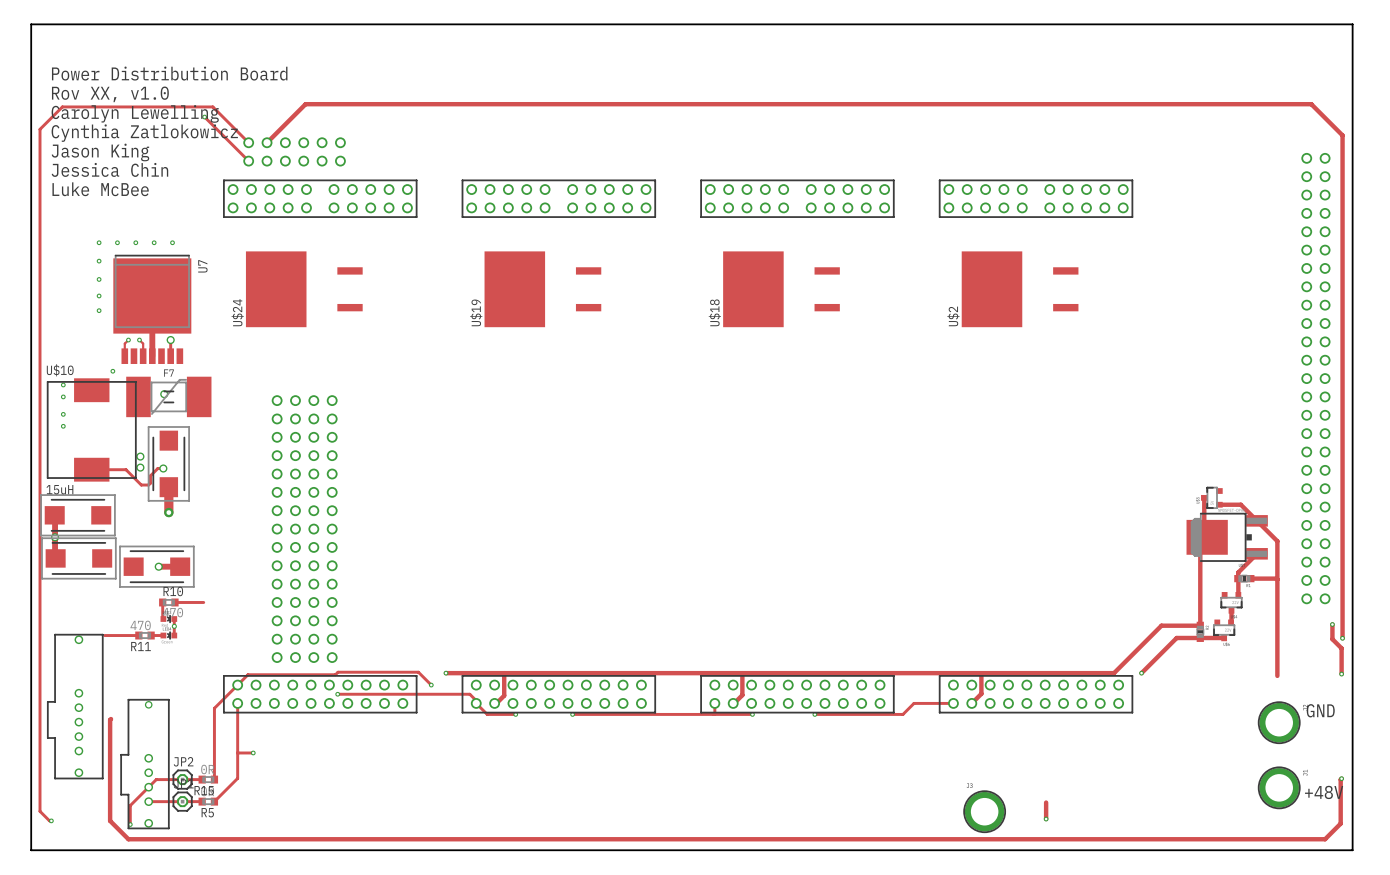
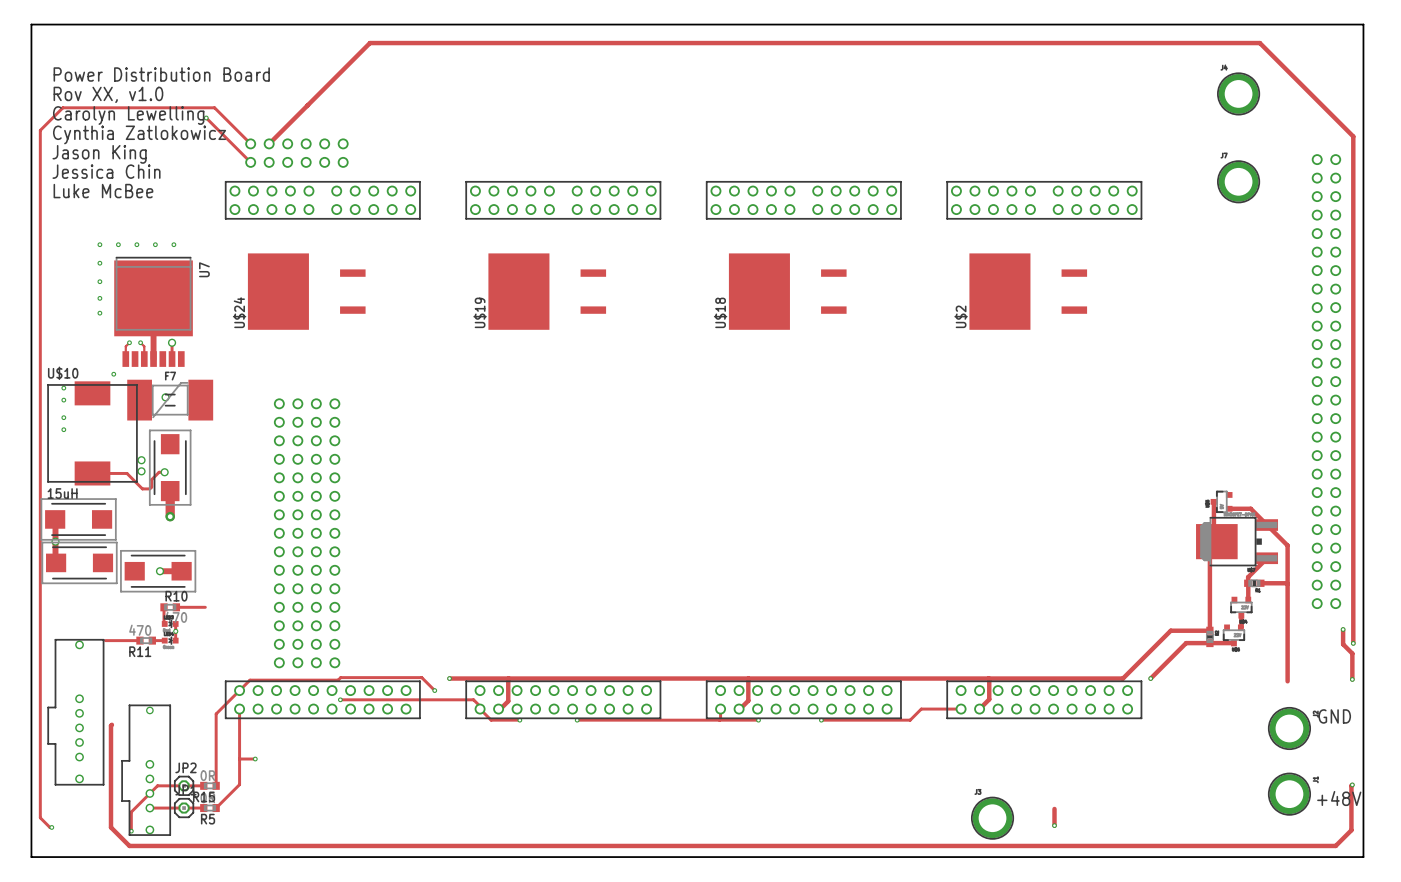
part: none -> (1238, 93)
track: (305, 104) (1311, 104) -> (308, 105) (370, 43) (1259, 43) (1321, 105)
part: none -> (1238, 181)

